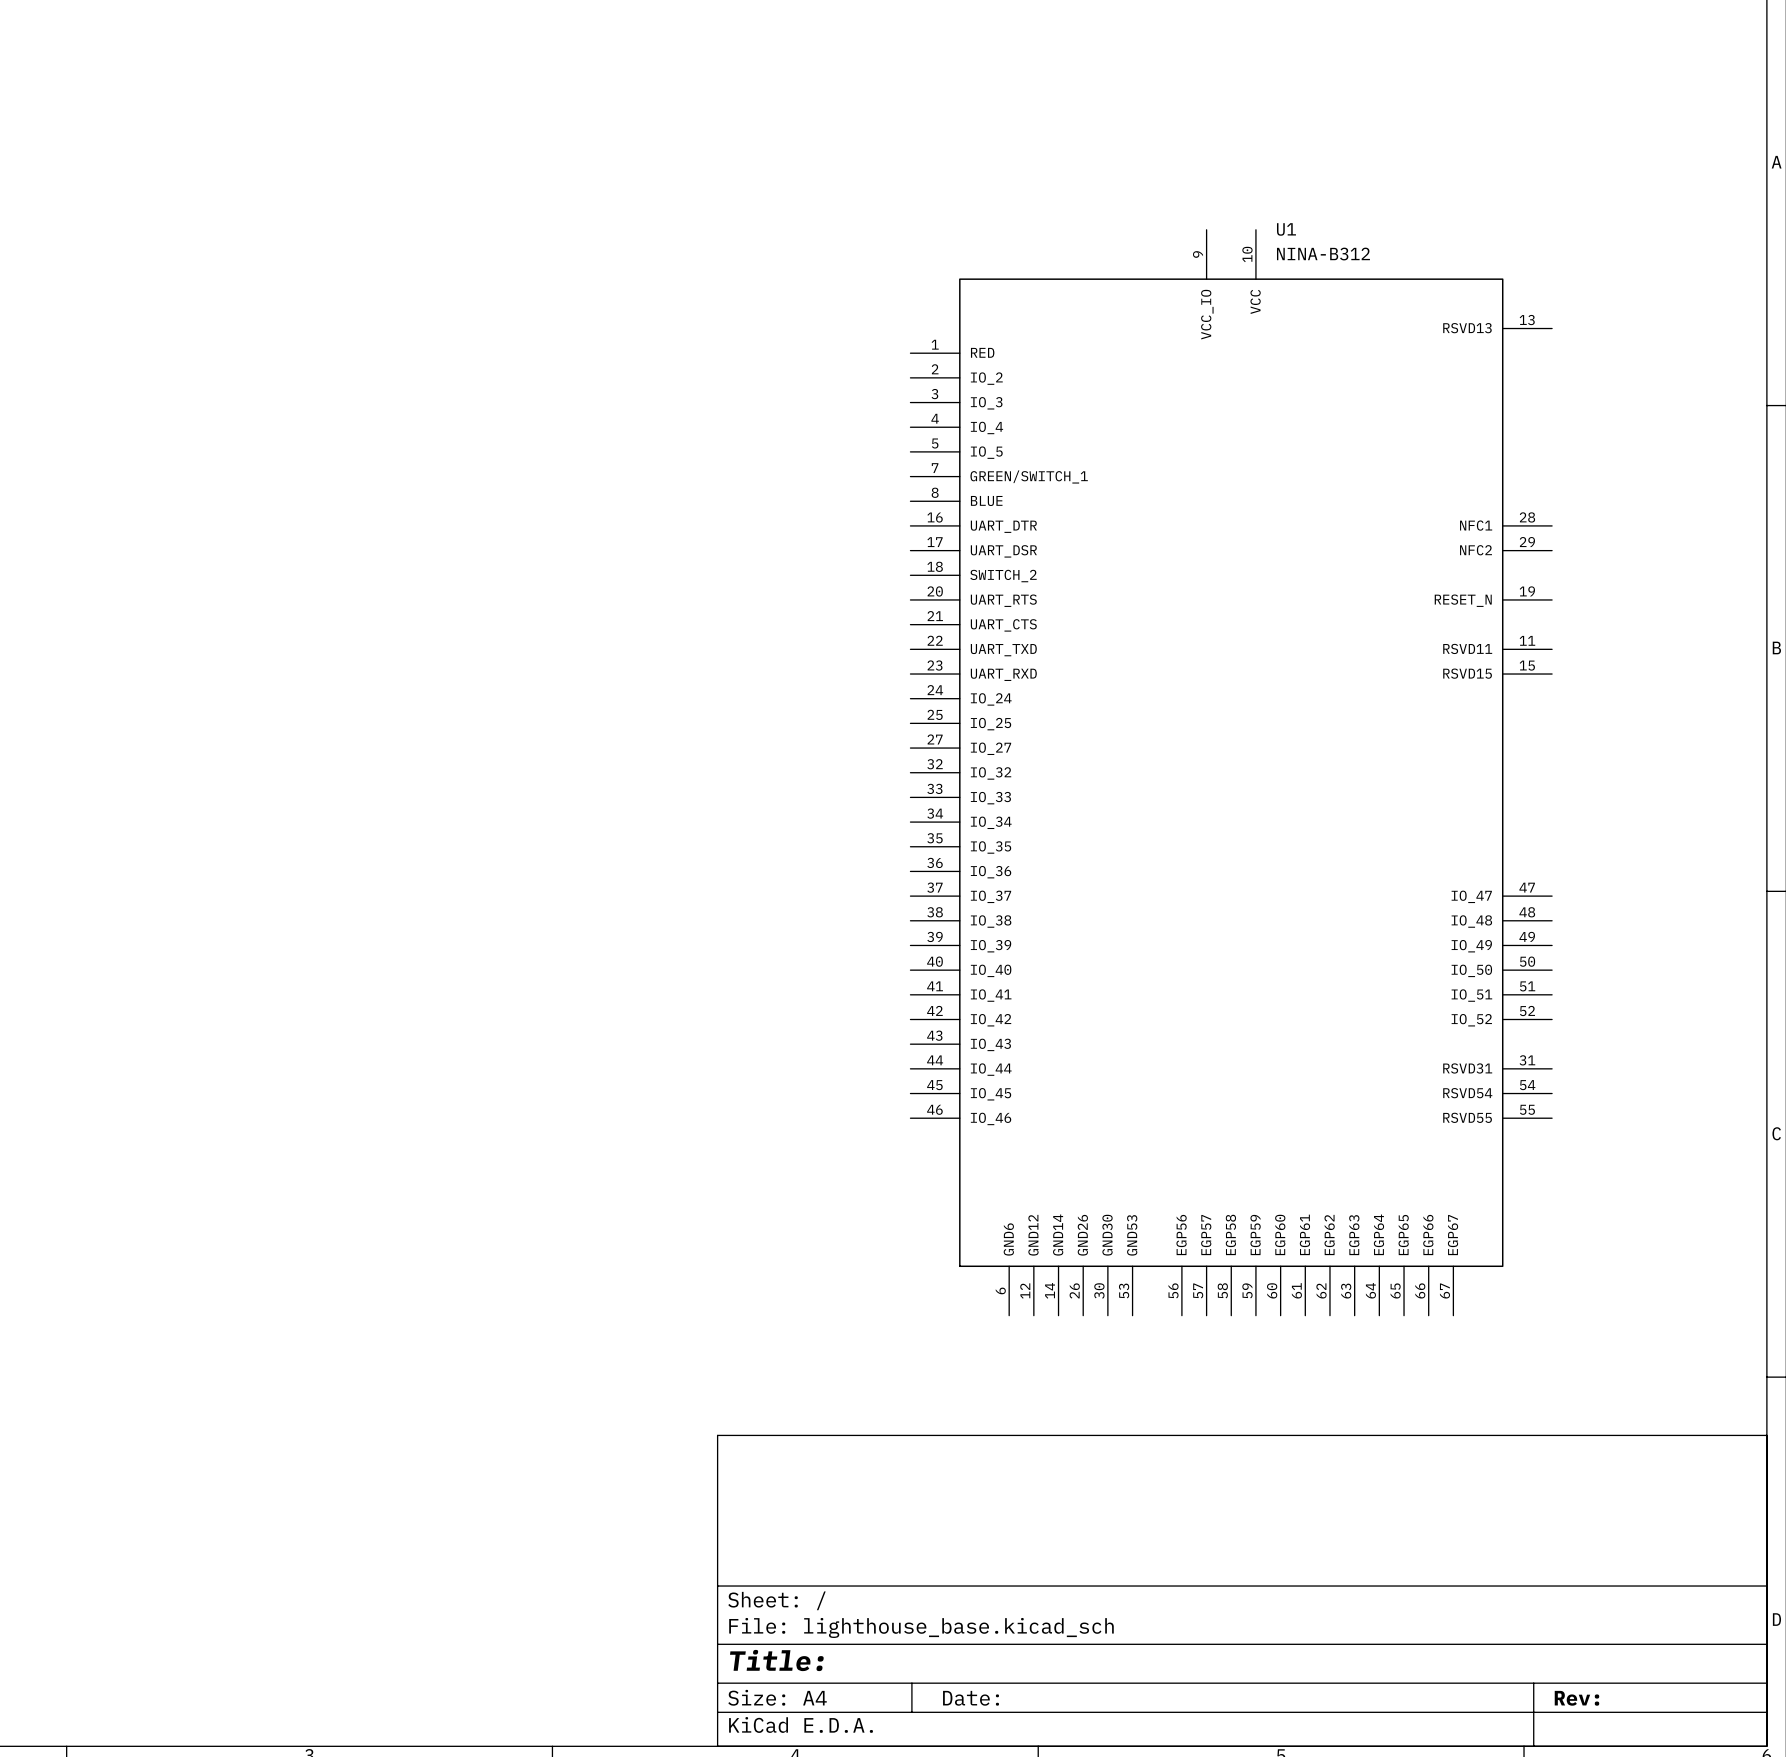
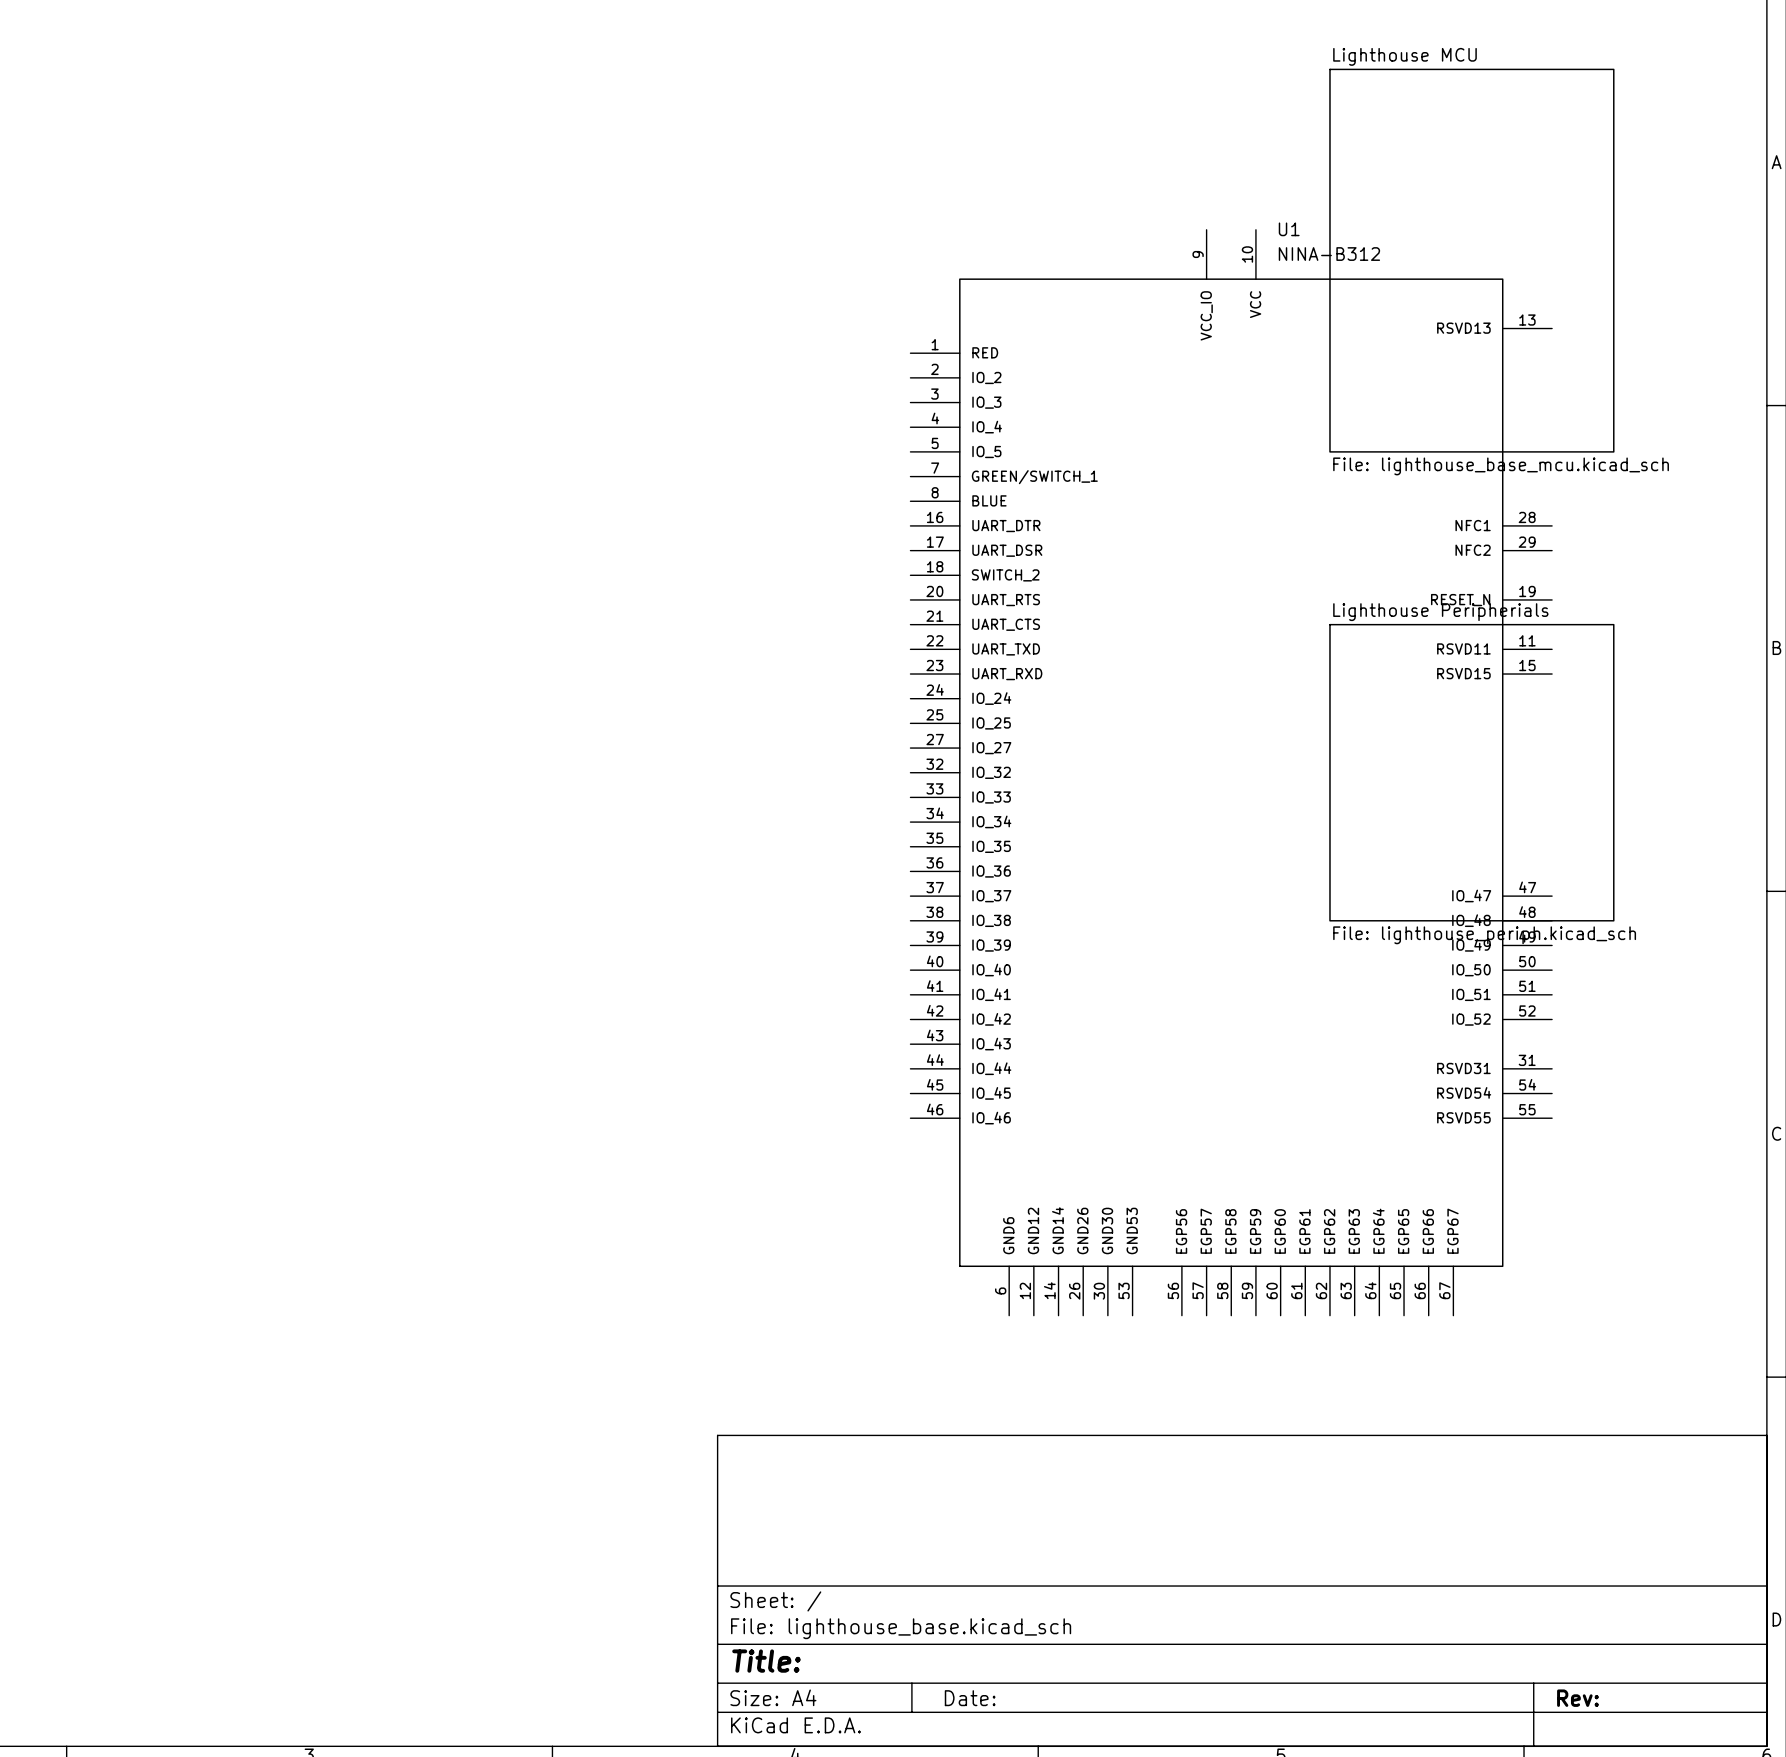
sheet Lighthouse MCU: none -> File: lighthouse_base_mcu.kicad_sch (1471, 260)
sheet Lighthouse Peripherials: none -> File: lighthouse_periph.kicad_sch (1471, 772)

